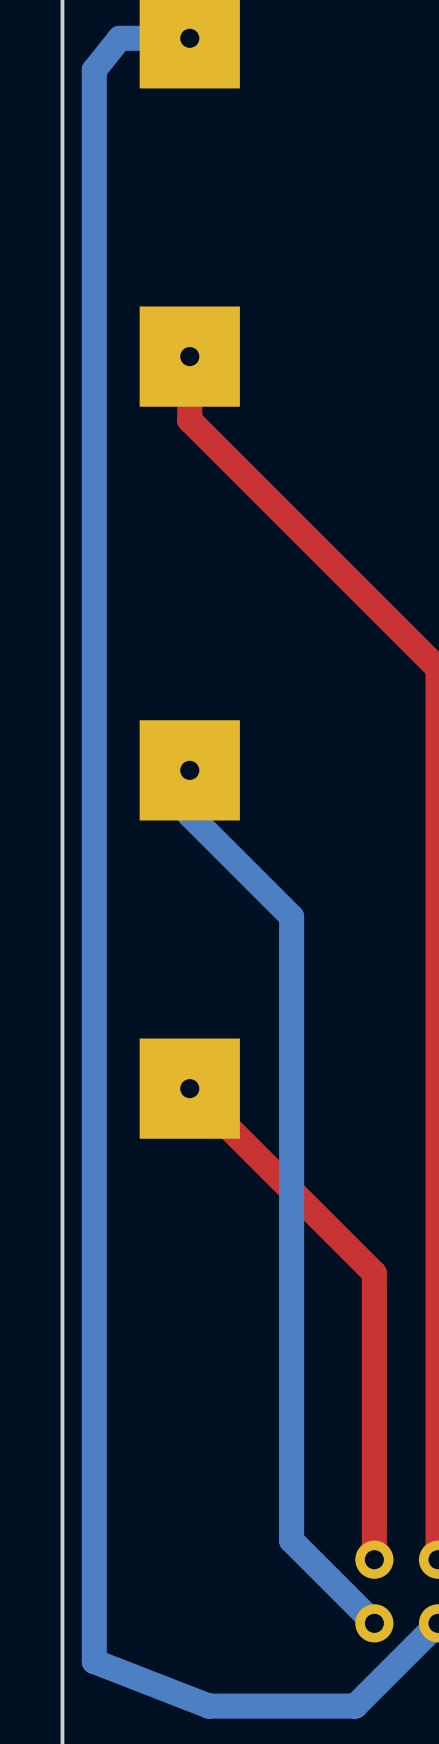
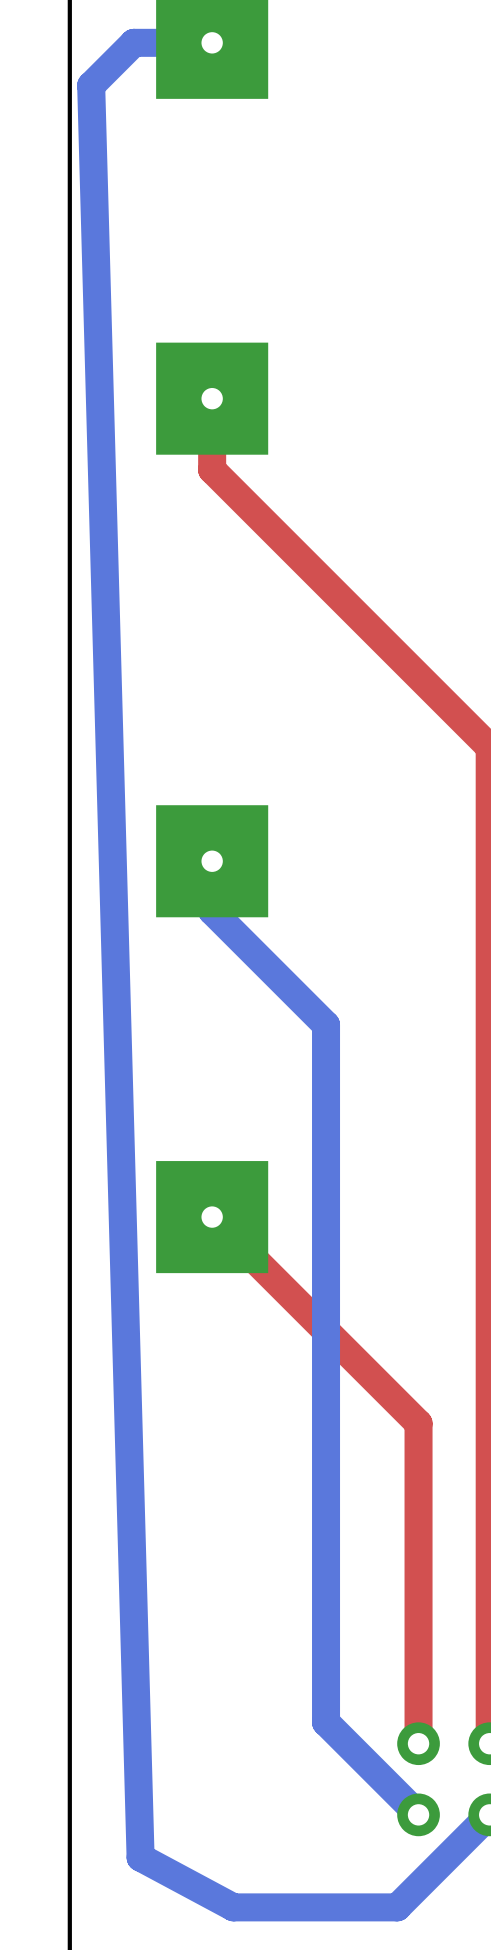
bottom track: (119, 38) (94, 70) (94, 1661) (208, 1706) -> (133, 42) (91, 85) (140, 1857) (233, 1907)

